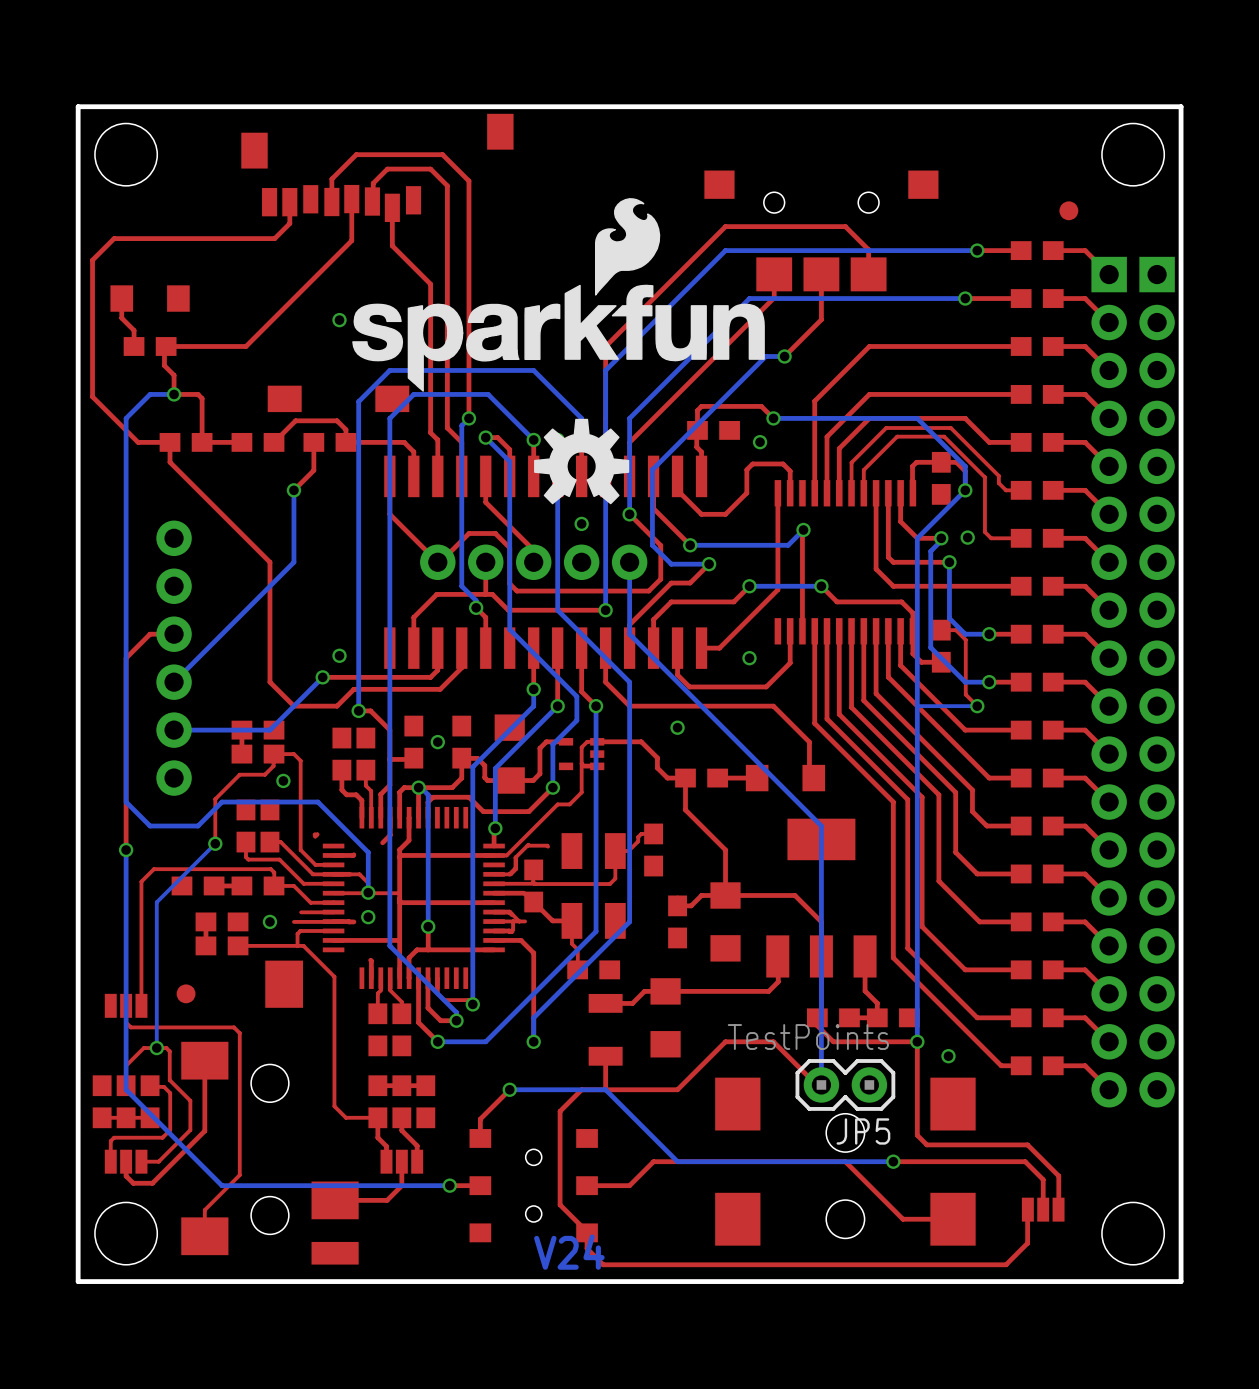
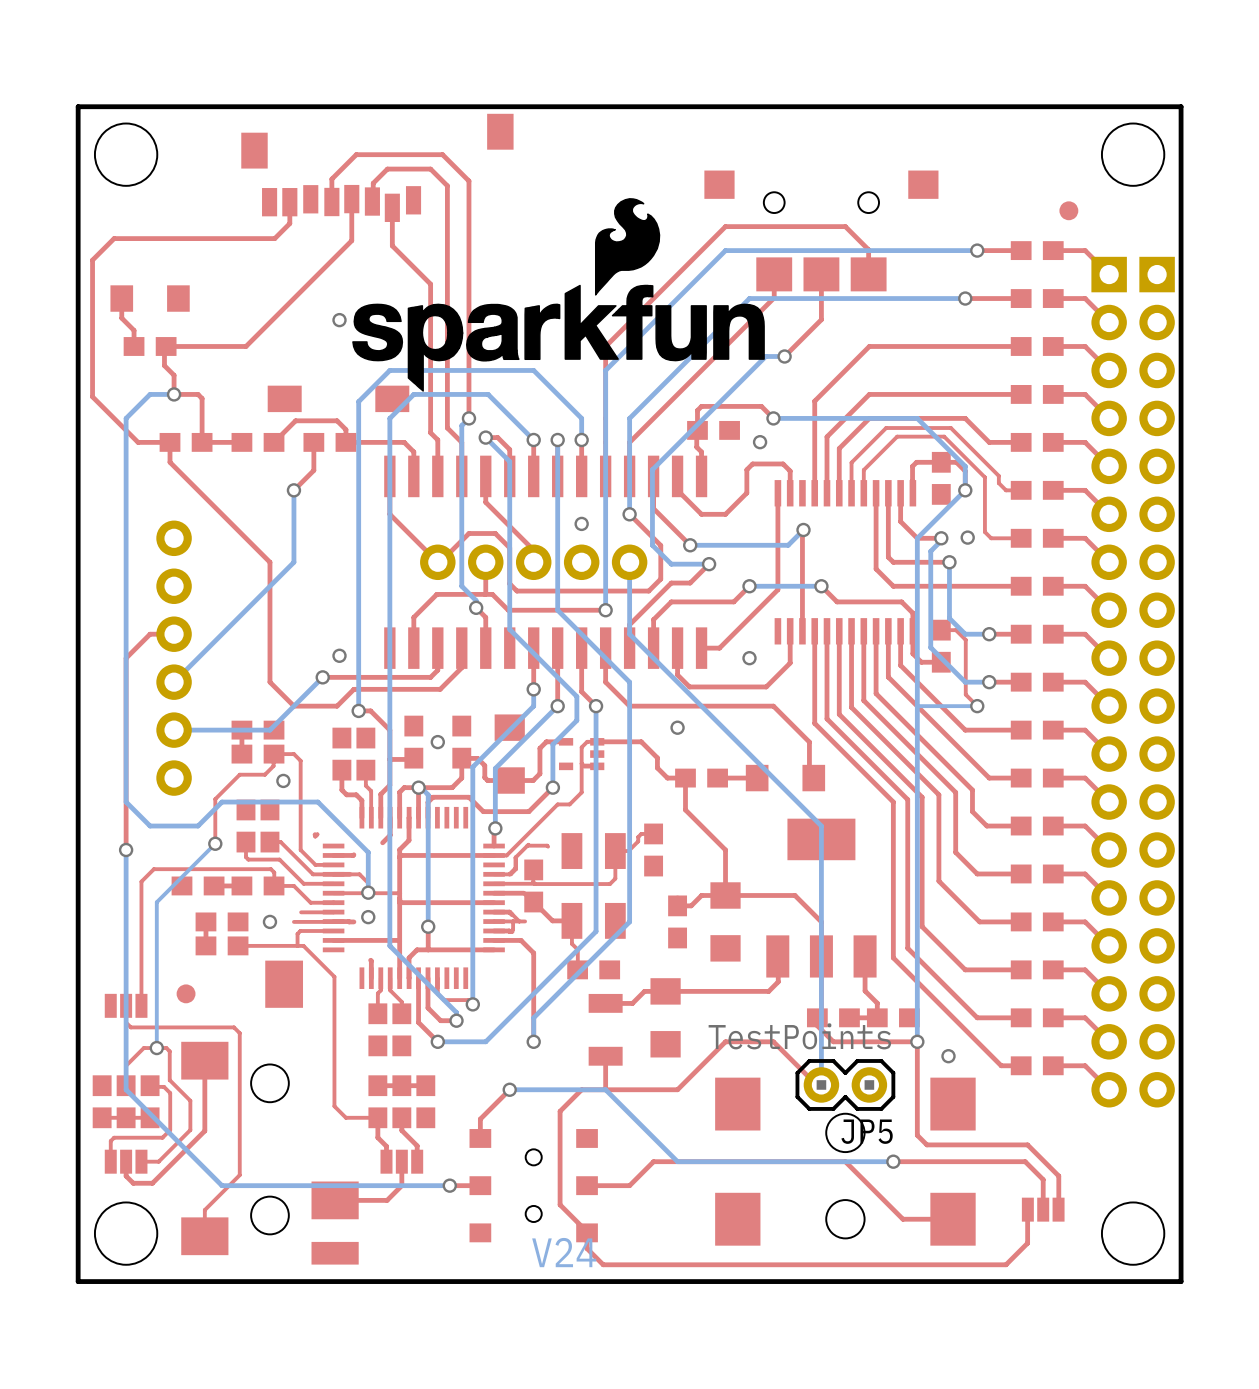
drawing: [534, 418, 630, 505] -> none

